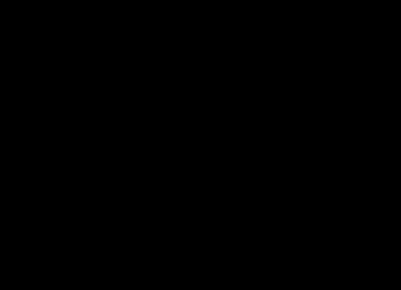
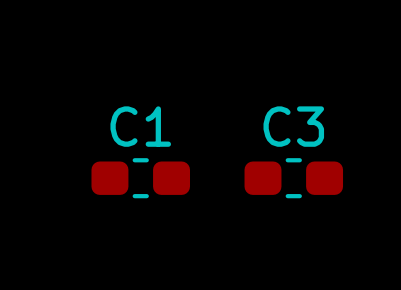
C1: none -> (140, 178)
C3: none -> (293, 178)

